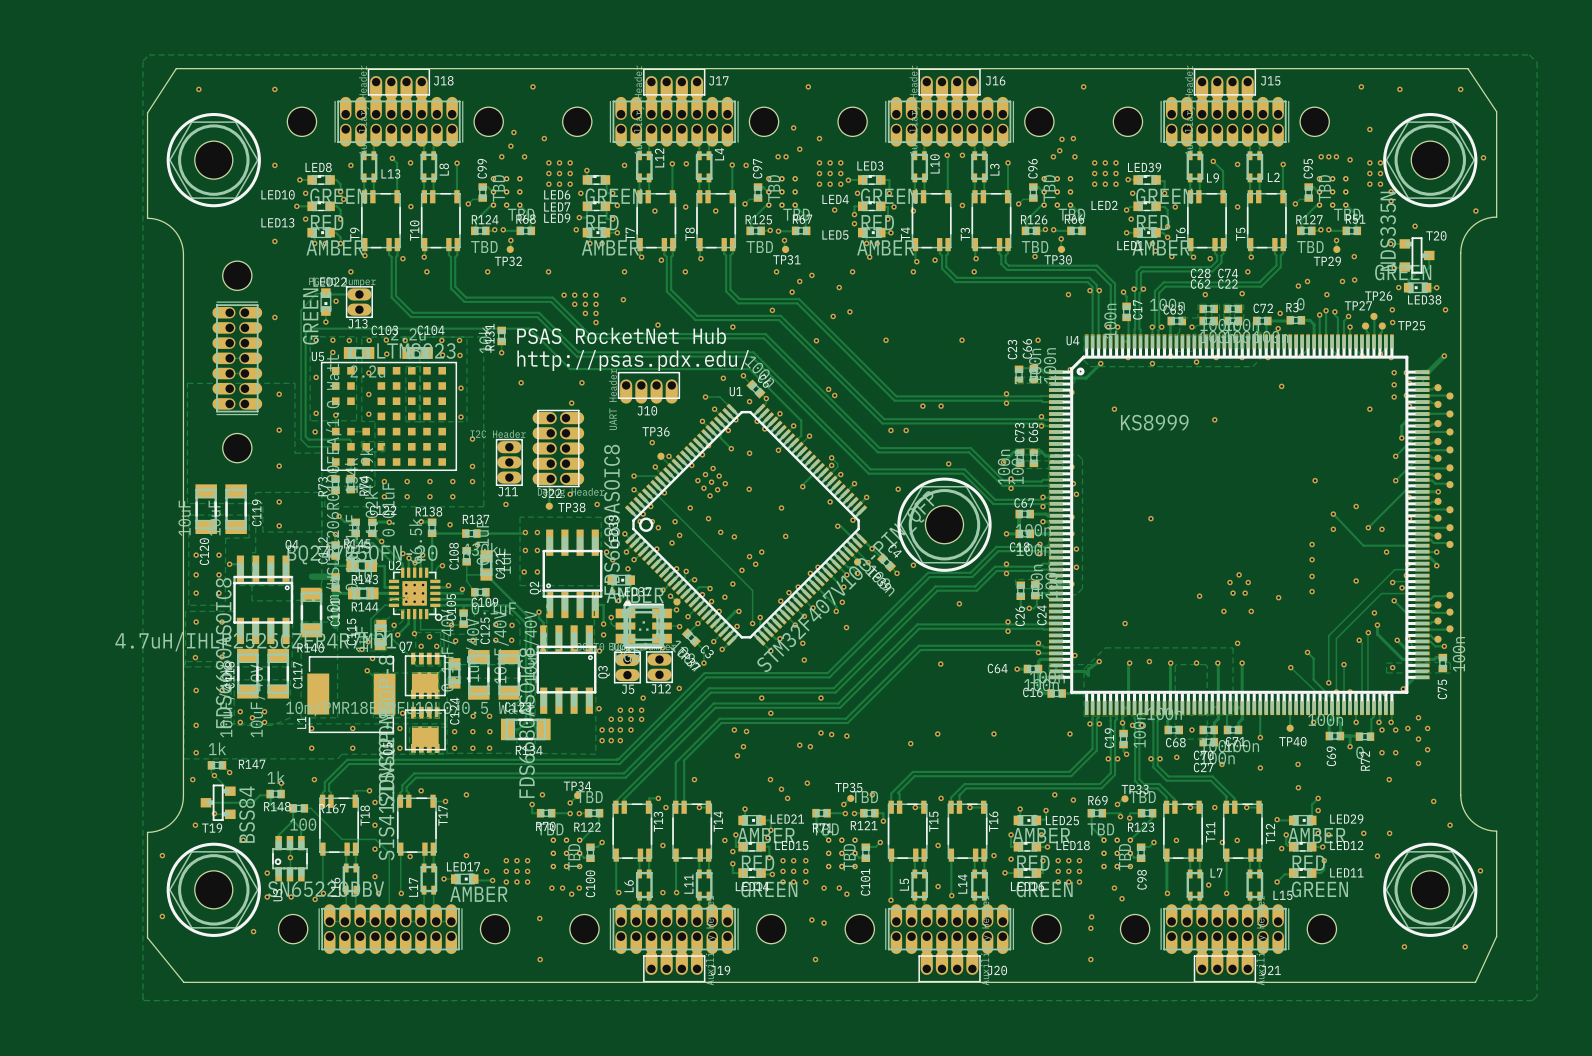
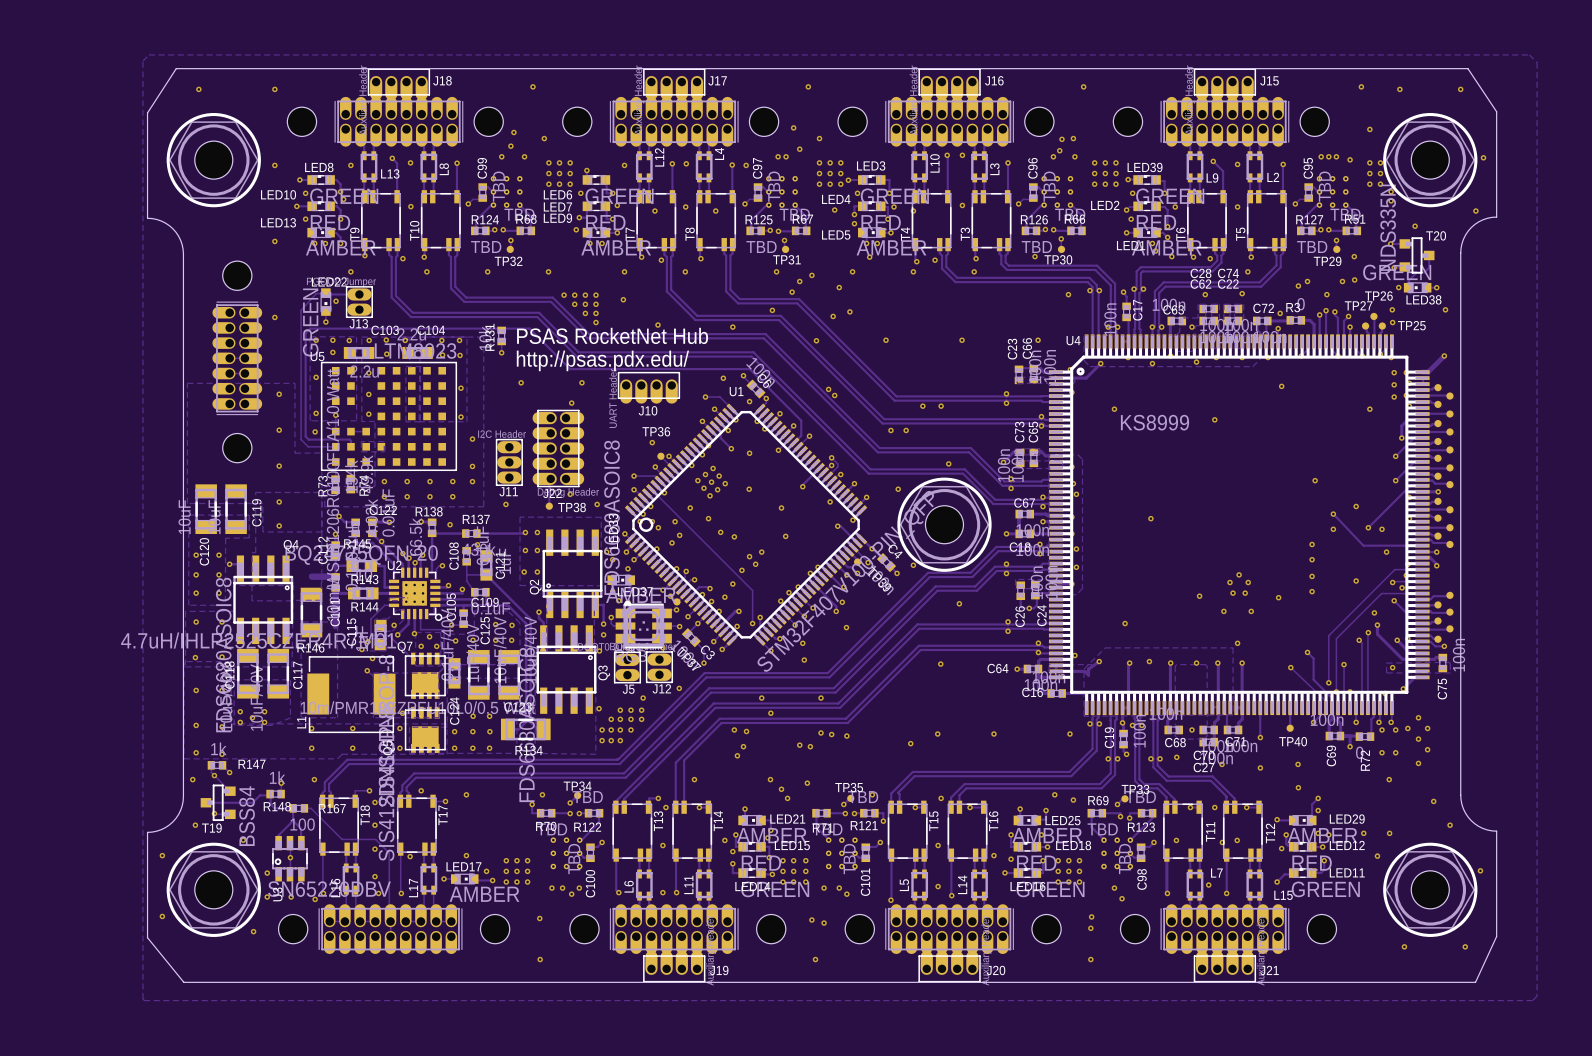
via: none -> (222, 726)
via: none -> (222, 754)

